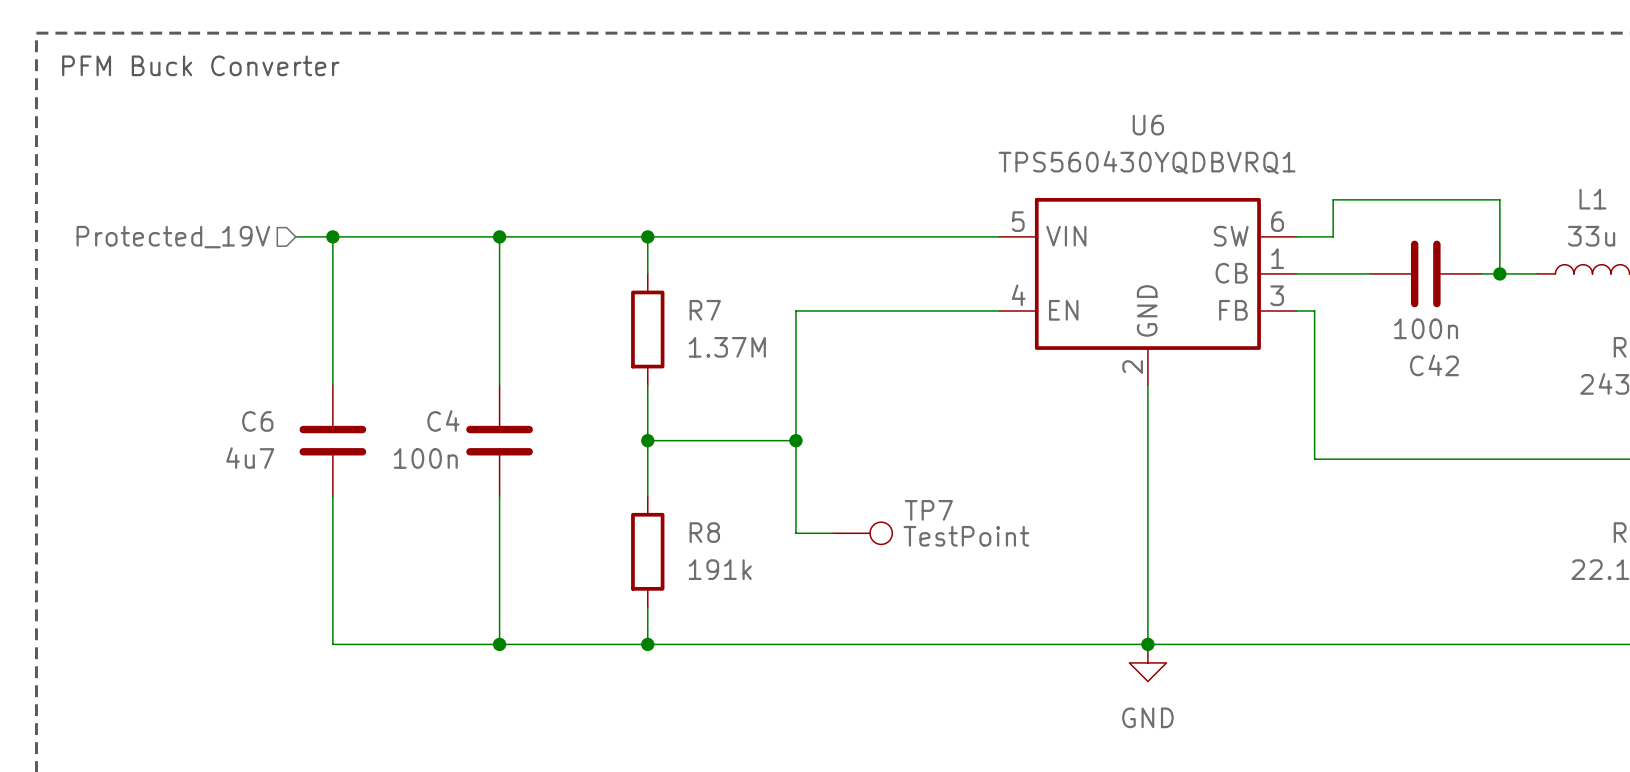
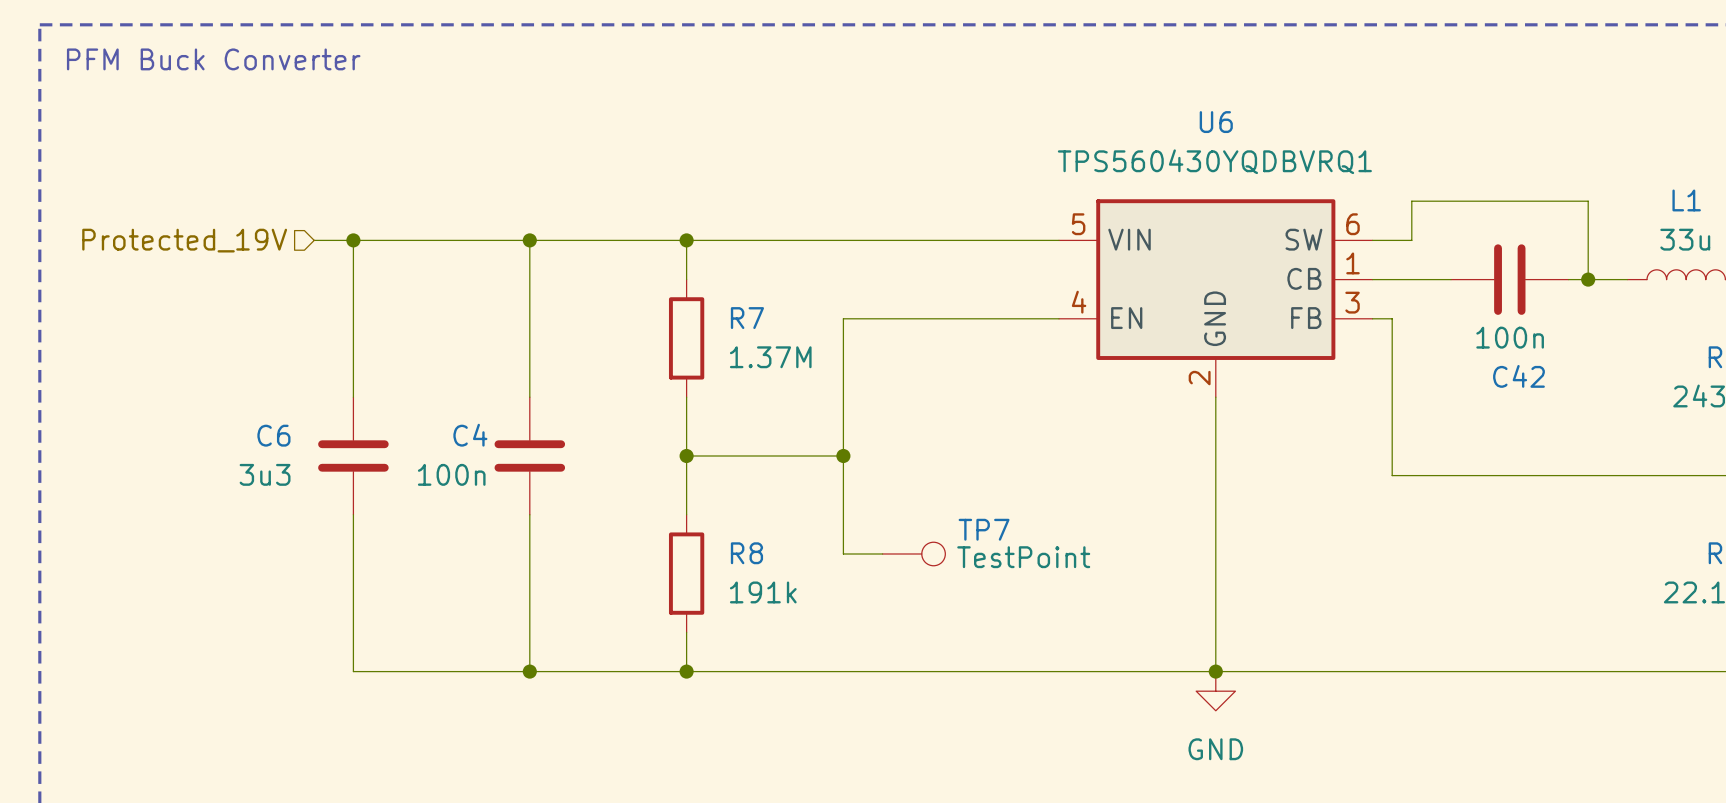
C6 value: 4u7 (250, 458) -> 3u3 (265, 474)

